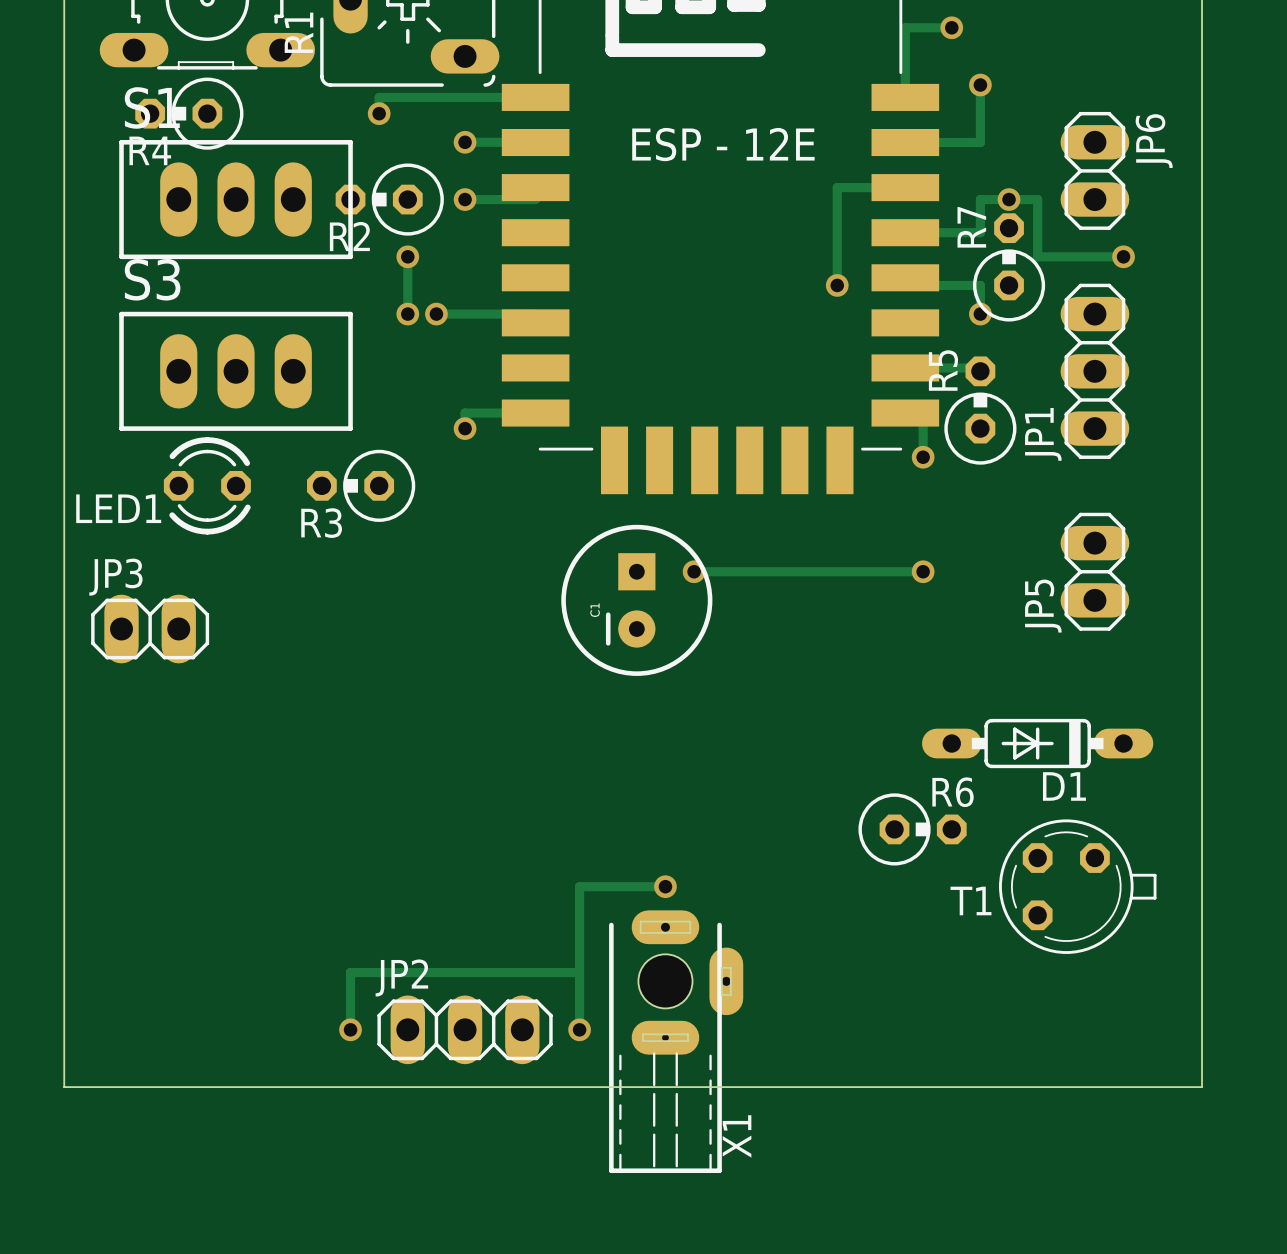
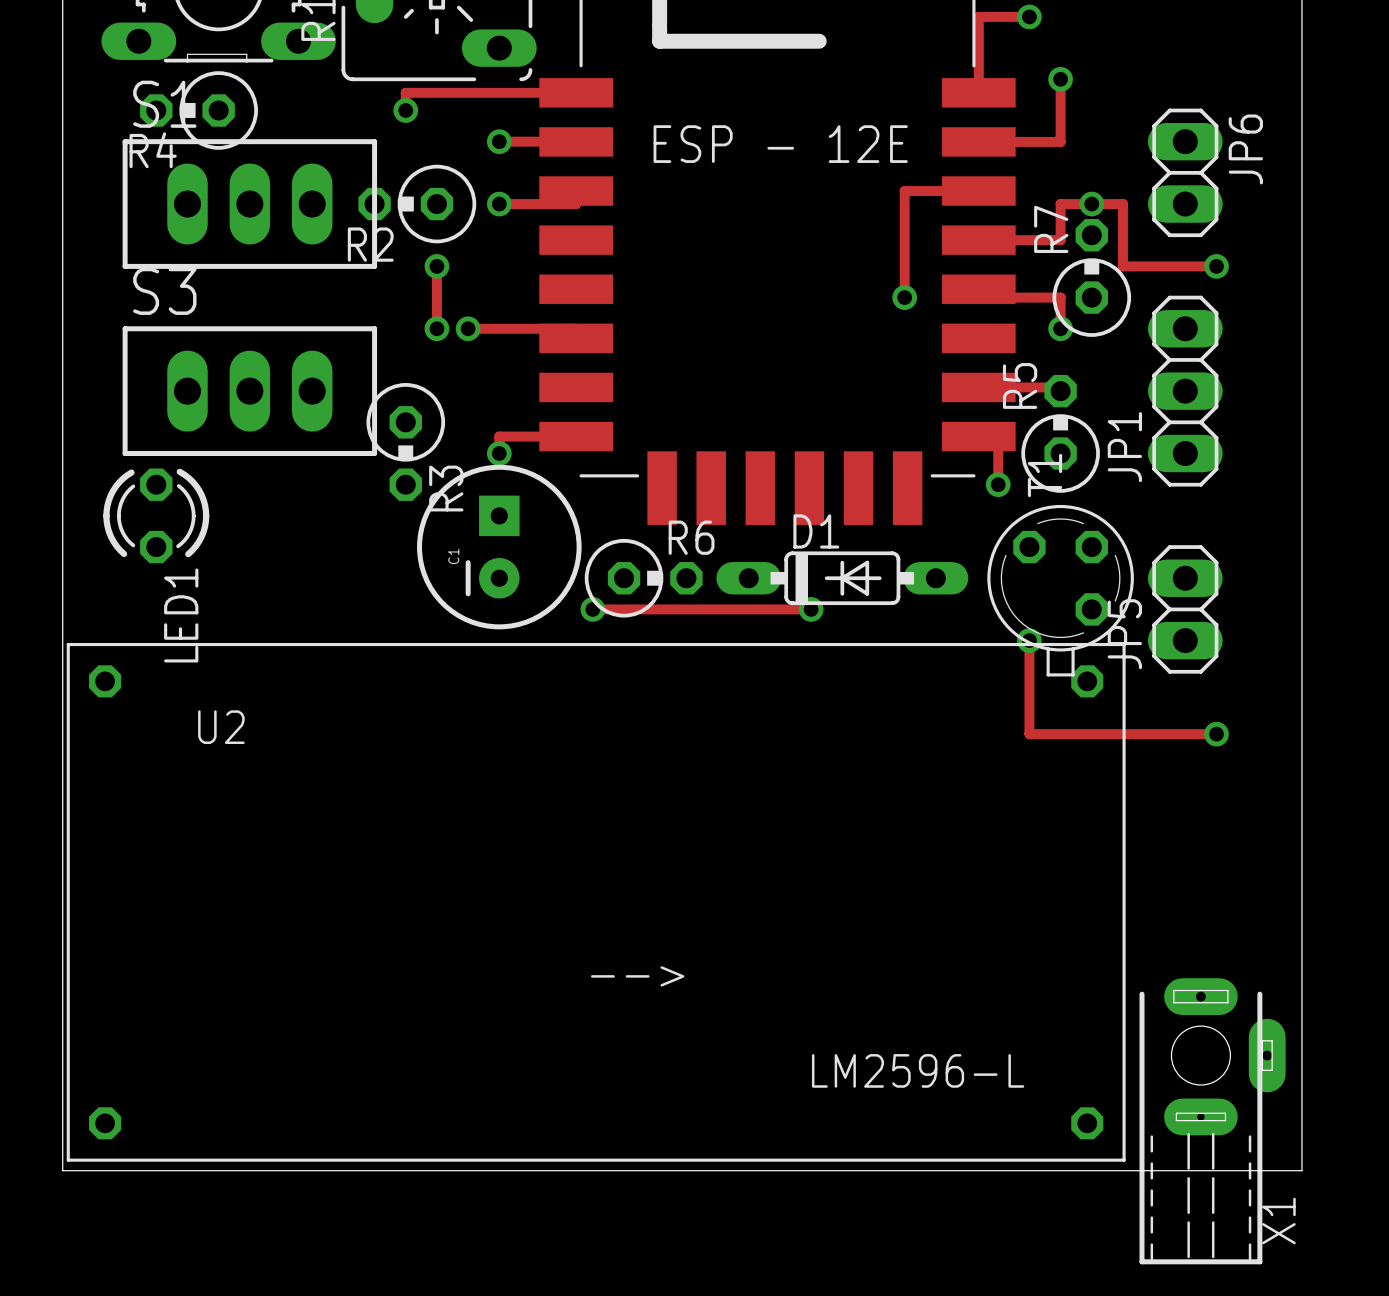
LED1 rotation: 0° (207, 485) -> 90° counterclockwise (156, 515)
R3 rotation: 0° (361, 485) -> 90° counterclockwise (405, 441)
R3 position: (361, 485) -> (405, 441)
track: none -> (592, 609) (748, 609)
via: none -> (592, 609)
via position: (694, 571) -> (811, 609)
track: (751, 571) (923, 571) -> none
via position: (923, 571) -> (1029, 640)
C1 position: (636, 600) -> (499, 547)
track: none -> (1029, 640) (1029, 734) (1216, 734)
JP3: (150, 629) -> none
via: none -> (1216, 734)
D1 rotation: 0° (1037, 743) -> 180° (842, 578)
D1 position: (1037, 743) -> (842, 578)
R6 position: (912, 829) -> (643, 578)
U2: none -> (596, 902)
track: (665, 886) (579, 886) (579, 1029) -> none
via: (665, 886) -> none
T1 rotation: 0° (1077, 886) -> 90° clockwise (1060, 590)
T1 position: (1077, 886) -> (1060, 590)
track: (579, 972) (350, 972) (350, 1029) -> none
via: (350, 1029) -> none
JP2: (465, 1029) -> none
via: (579, 1029) -> none
X1 position: (676, 1041) -> (1212, 1121)

